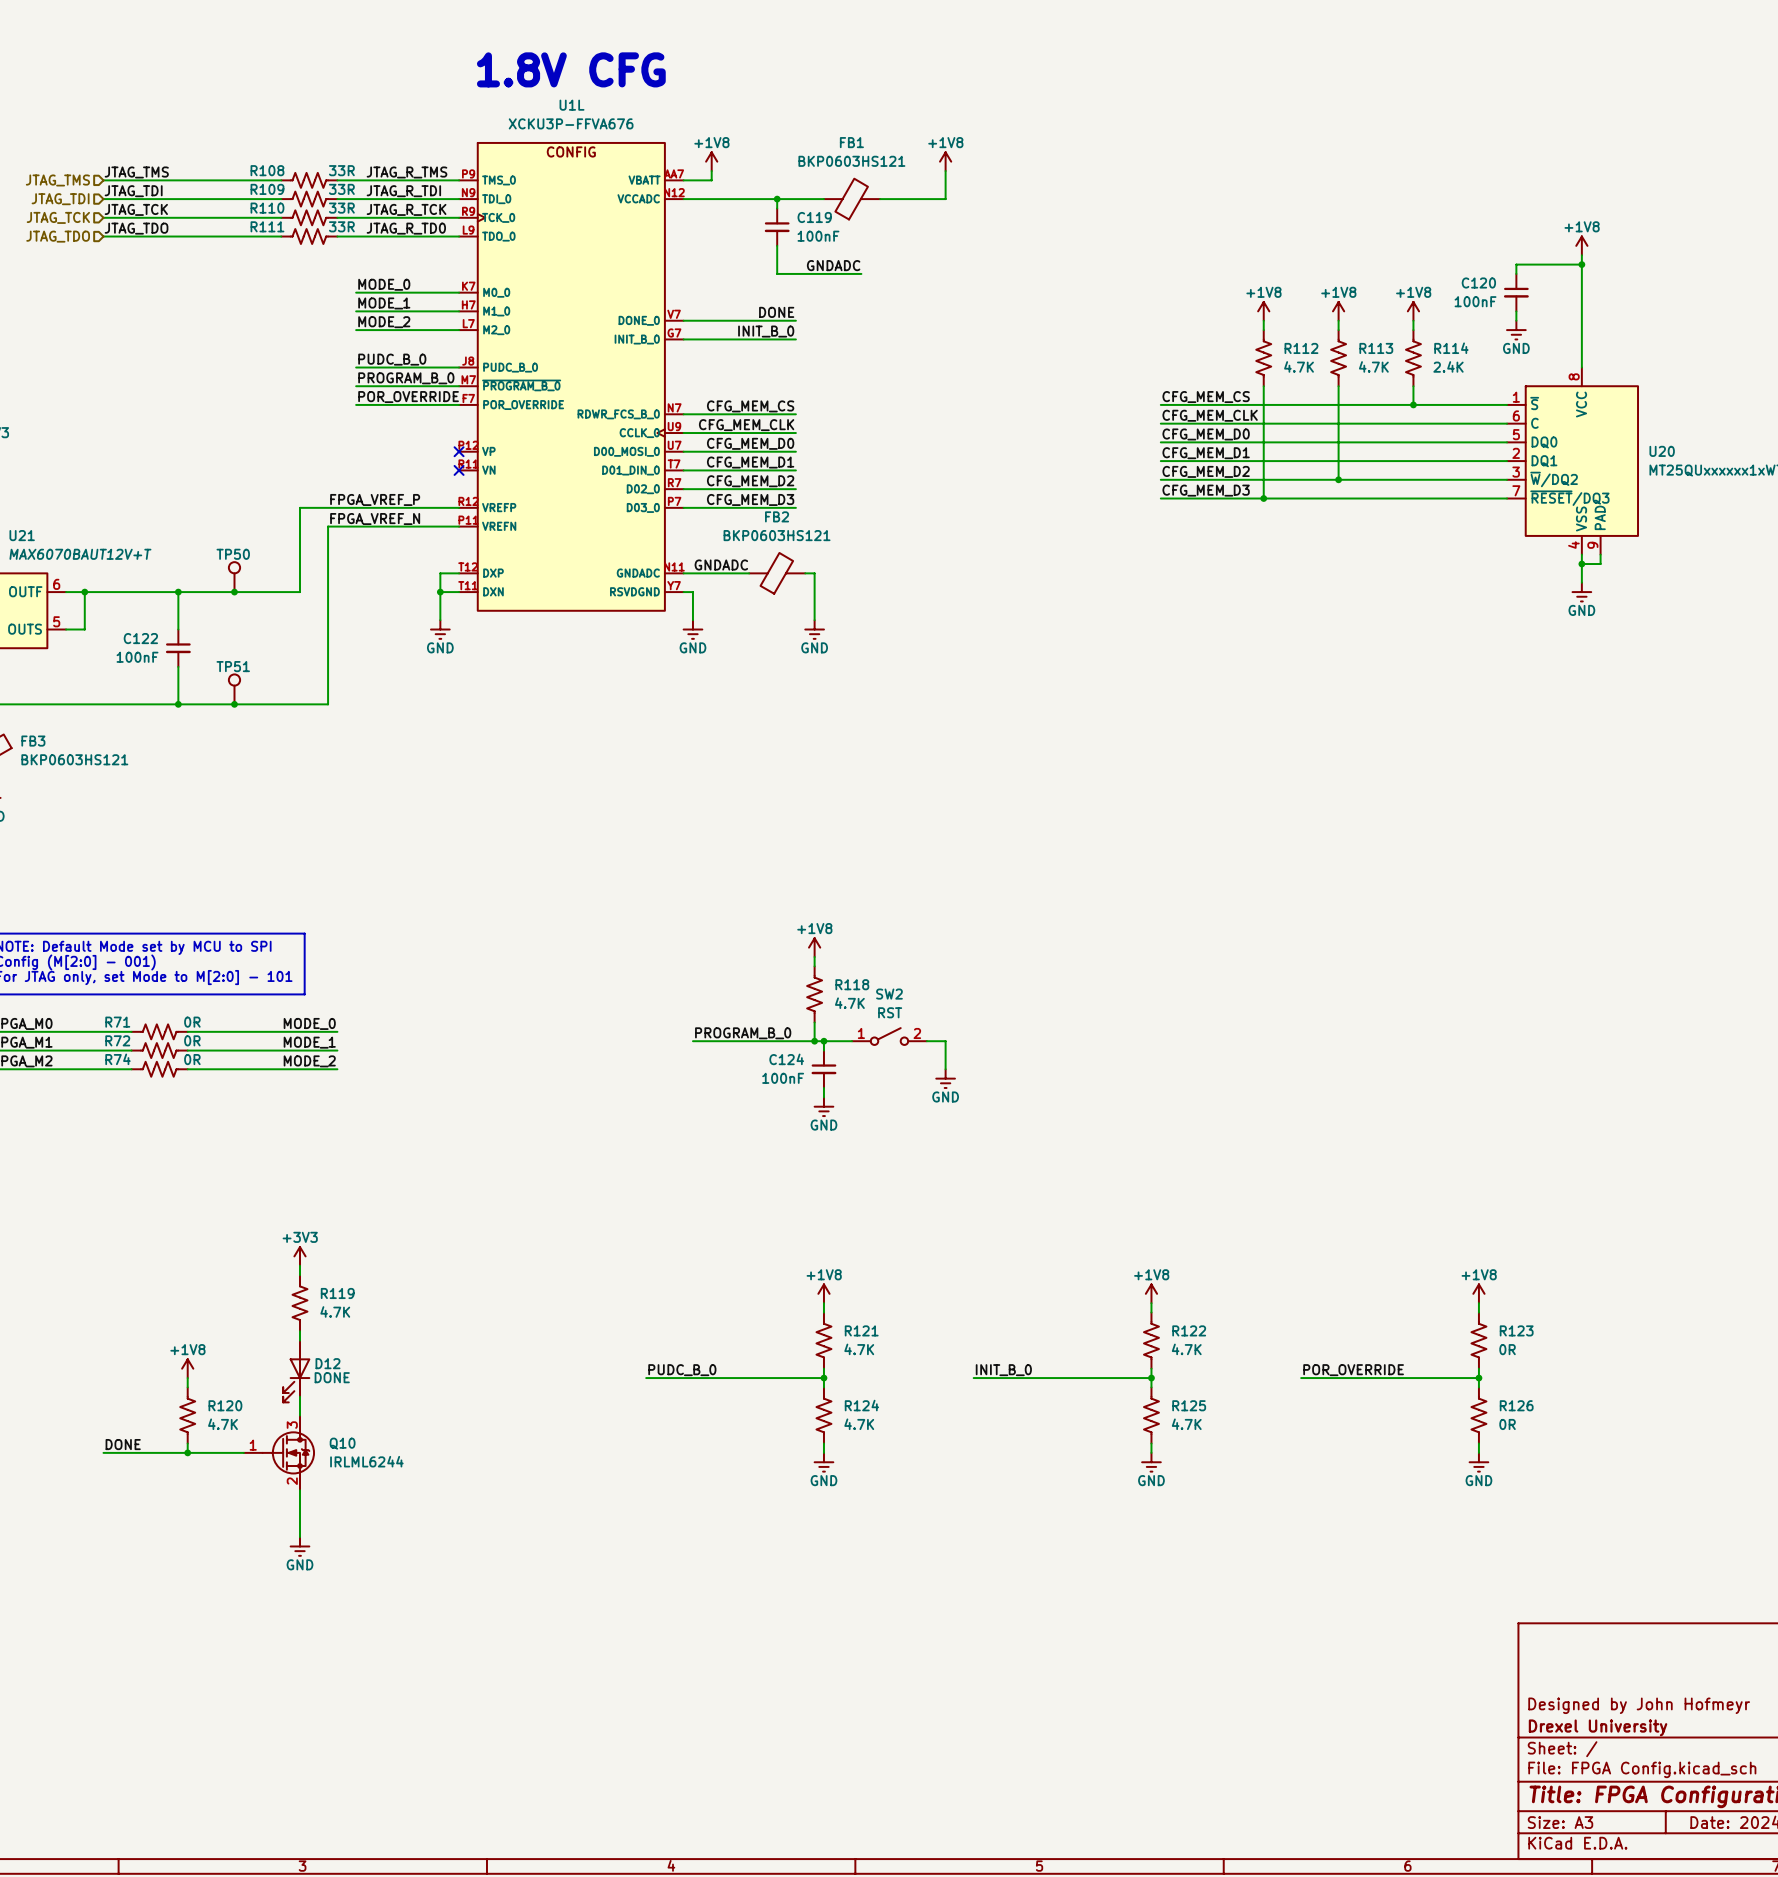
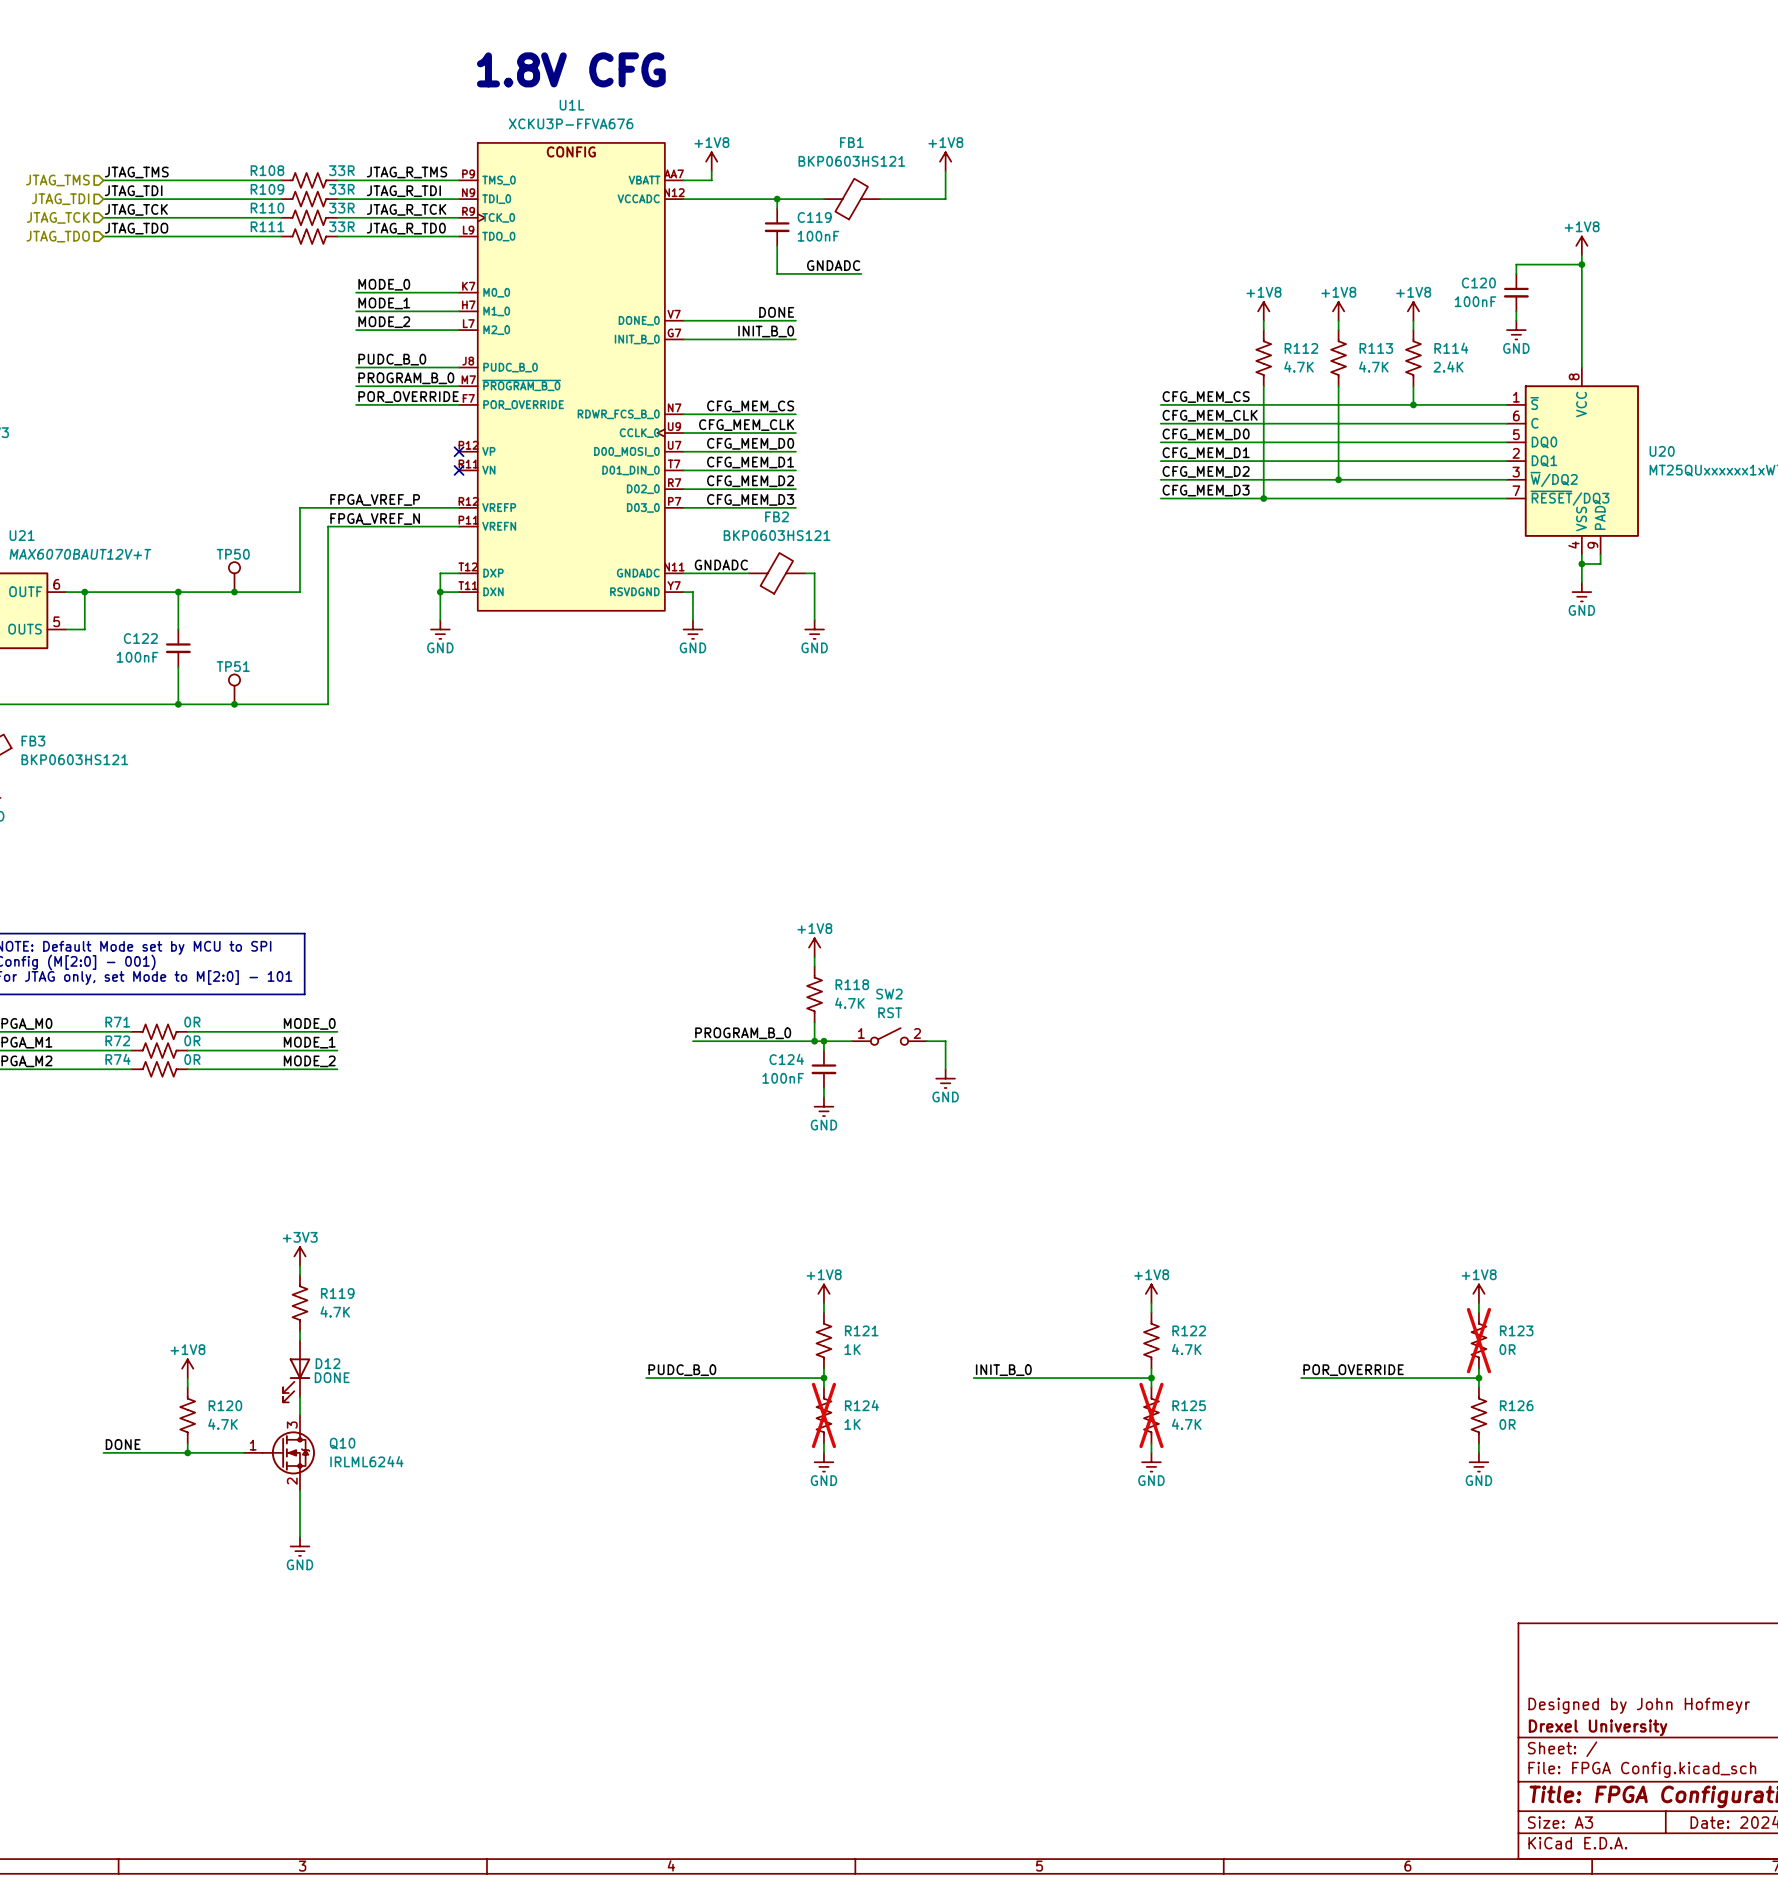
R123 do-not-place cross: none -> (1478, 1340)
R121 value: 4.7K (859, 1349) -> 1K (852, 1349)
R124 do-not-place cross: none -> (823, 1415)
R125 do-not-place cross: none -> (1151, 1415)
R124 value: 4.7K (859, 1424) -> 1K (852, 1424)

